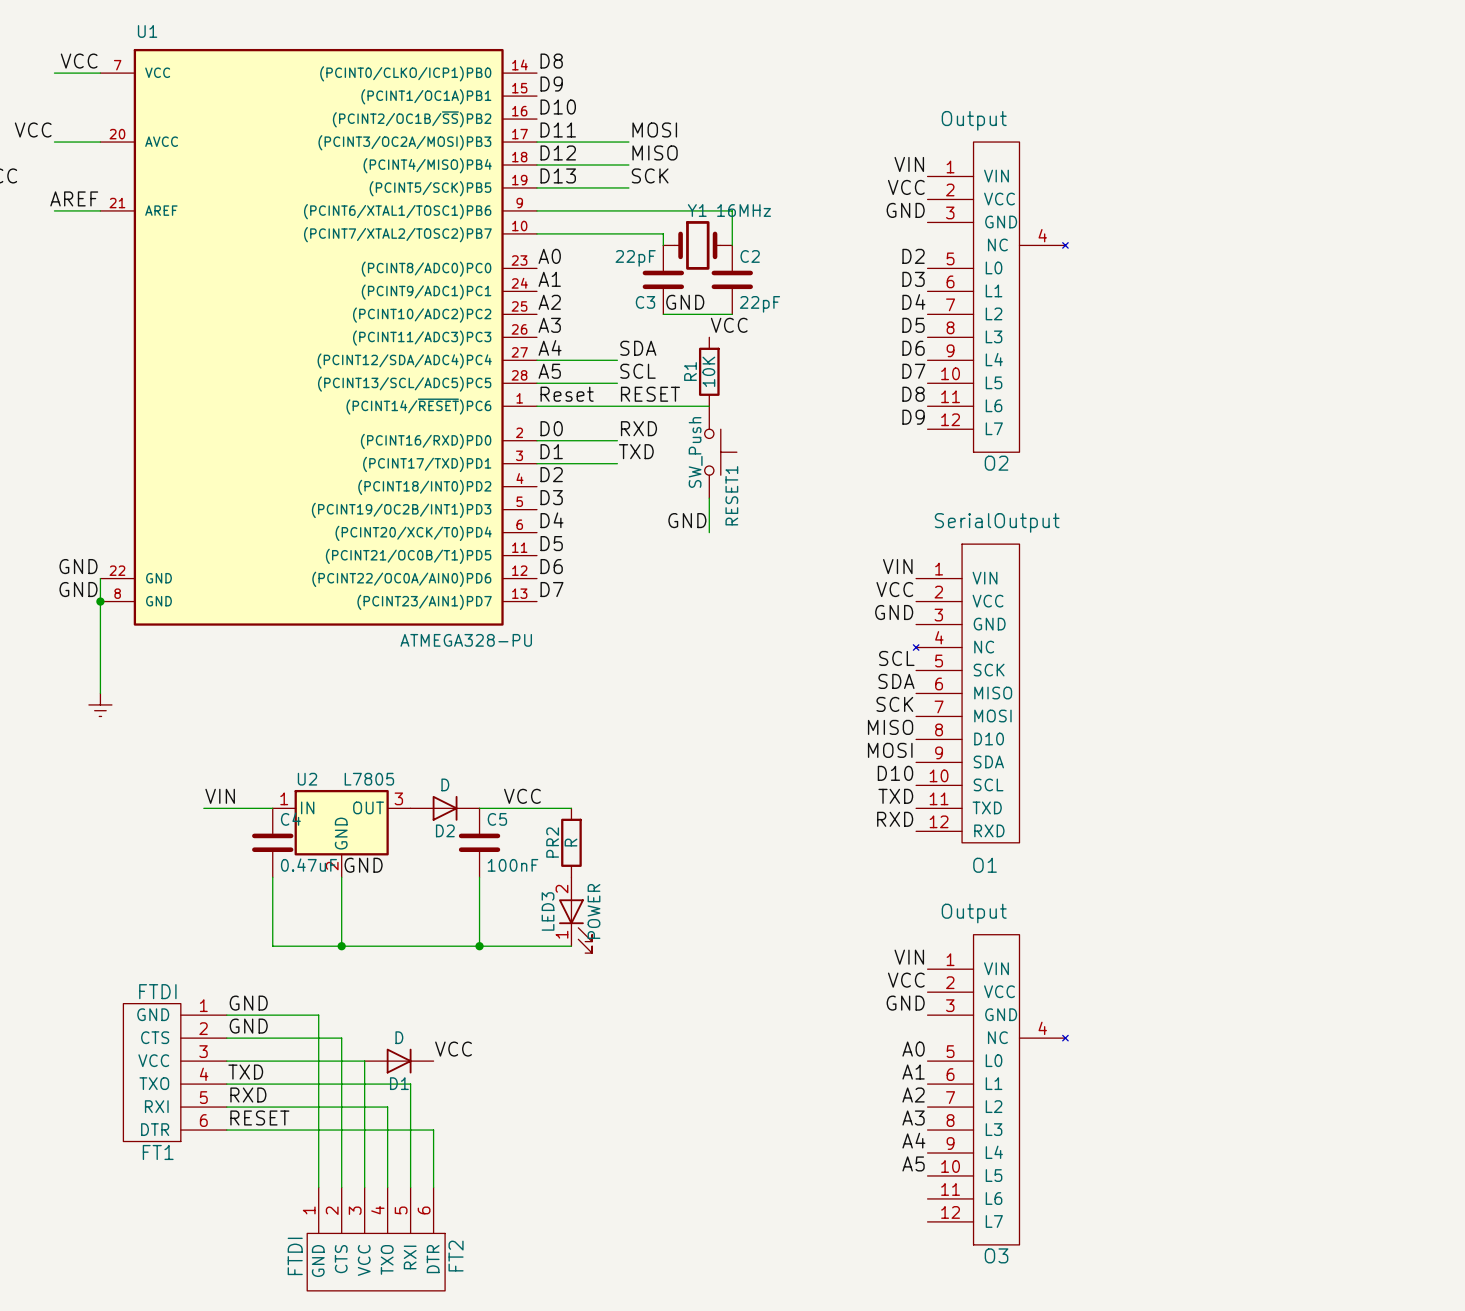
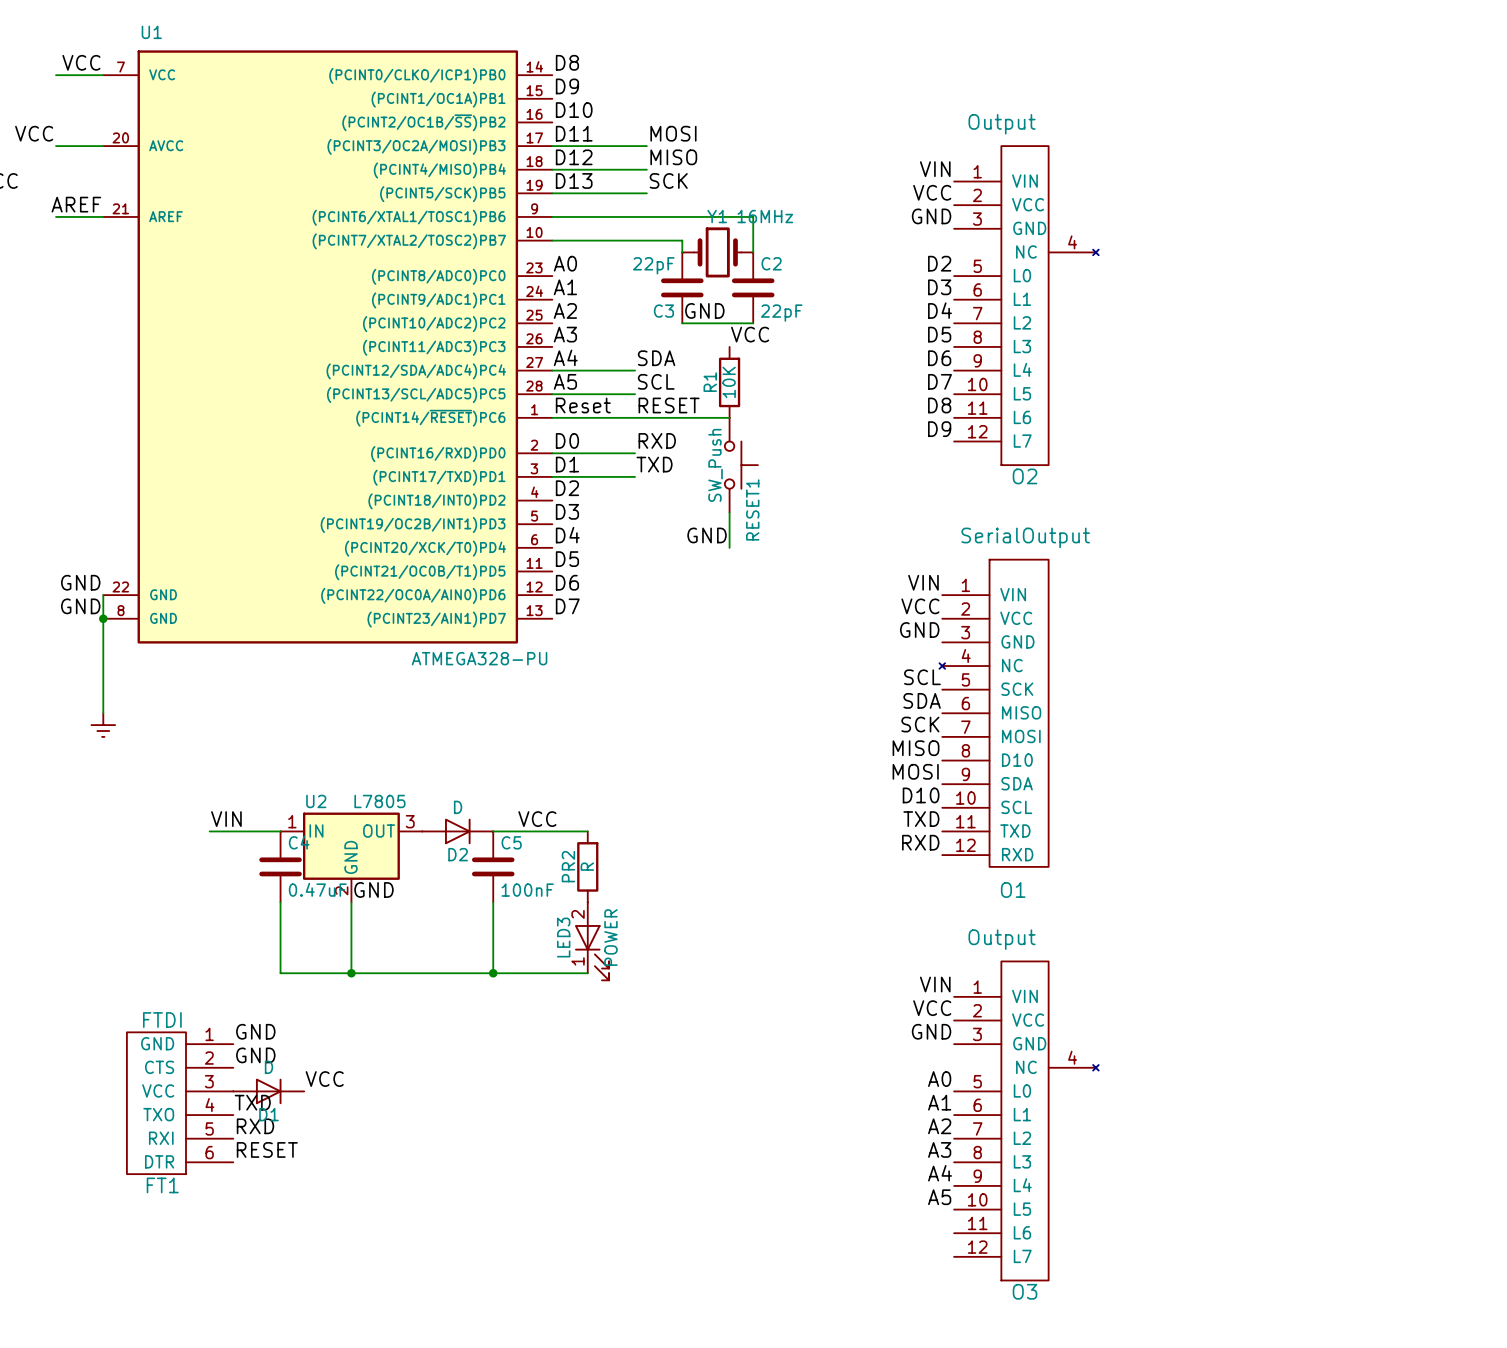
wire: (226, 1015) (318, 1015) (318, 1187) -> none
wire: (226, 1038) (341, 1038) (341, 1187) -> none
label position: VCC (453, 1049) -> VCC (324, 1079)
wire: (226, 1061) (364, 1061) (364, 1187) -> none
D1 position: (399, 1061) -> (268, 1091)
wire: (226, 1084) (410, 1084) (410, 1187) -> none
wire: (226, 1107) (387, 1107) (387, 1187) -> none
wire: (226, 1130) (433, 1130) (433, 1187) -> none
FT2: FTDI (376, 1239) -> none

